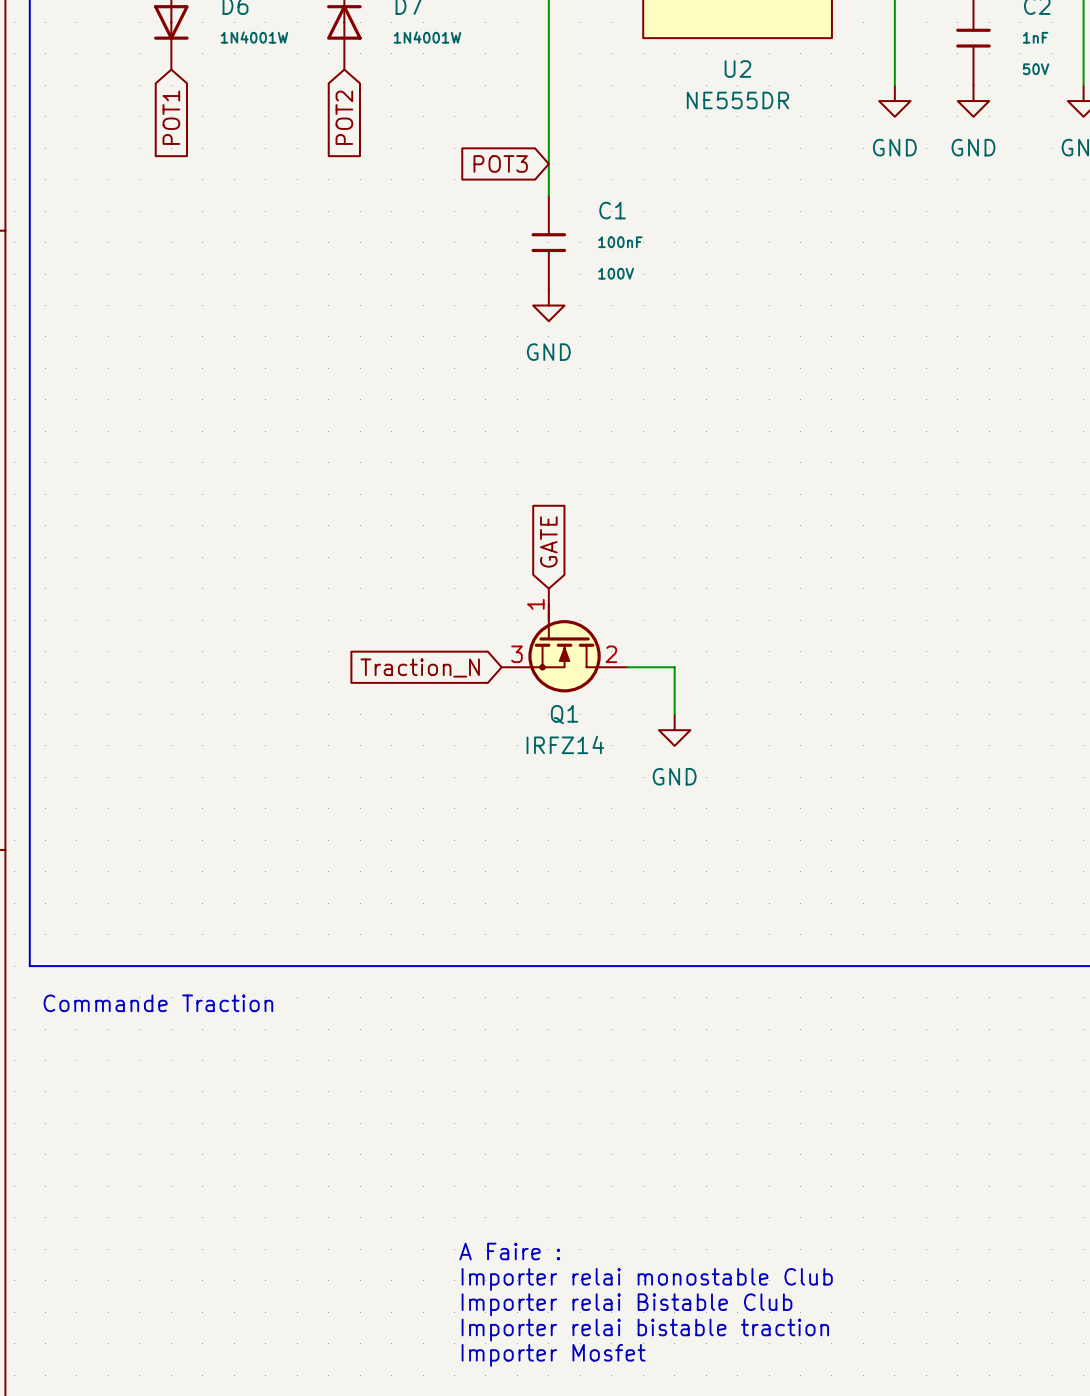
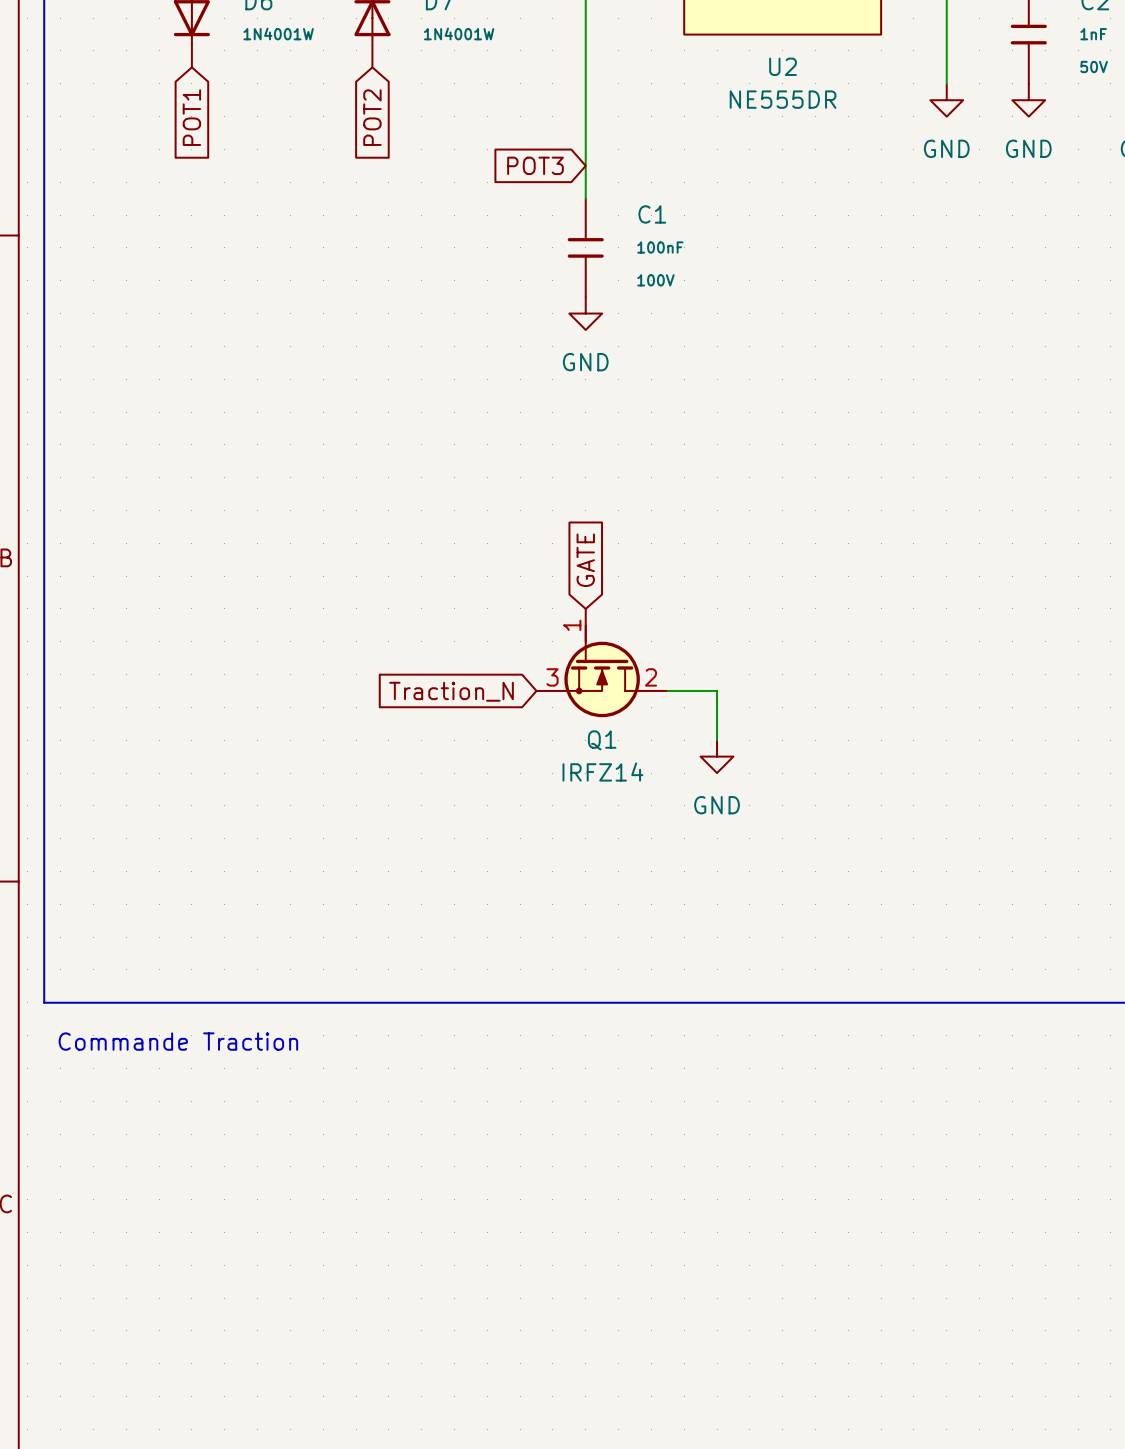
text: A Faire : (509, 1251) -> none
text: Importer relai monostable Club (647, 1279) -> none
text: Importer relai Bistable Club (626, 1304) -> none
text: Importer relai bistable traction (645, 1330) -> none
text: Importer Mosfet (553, 1355) -> none

